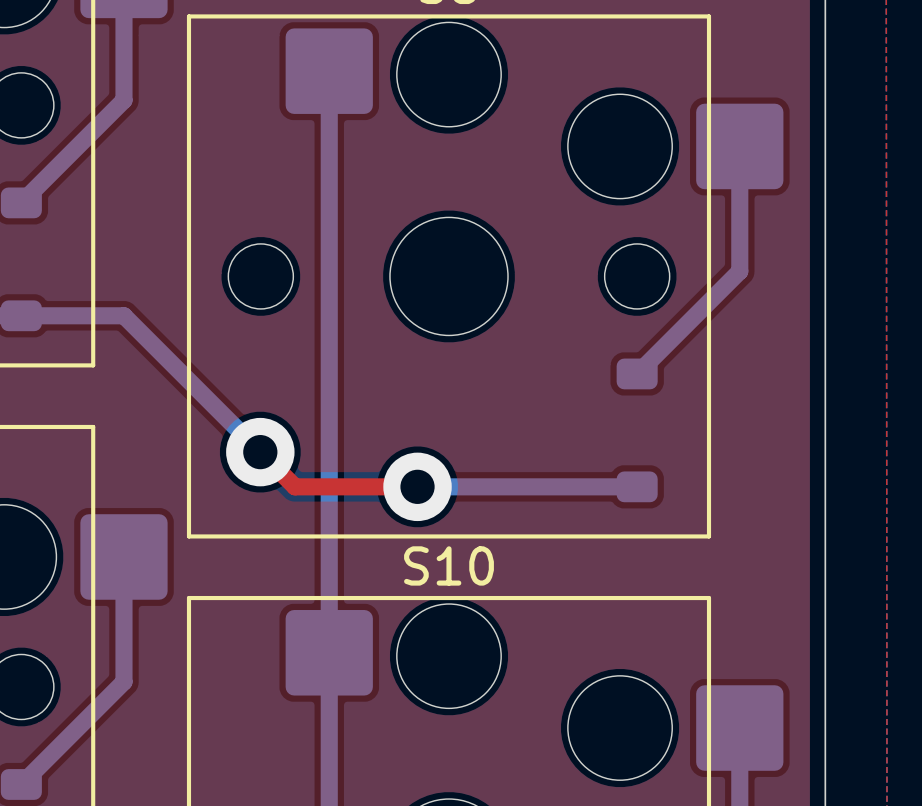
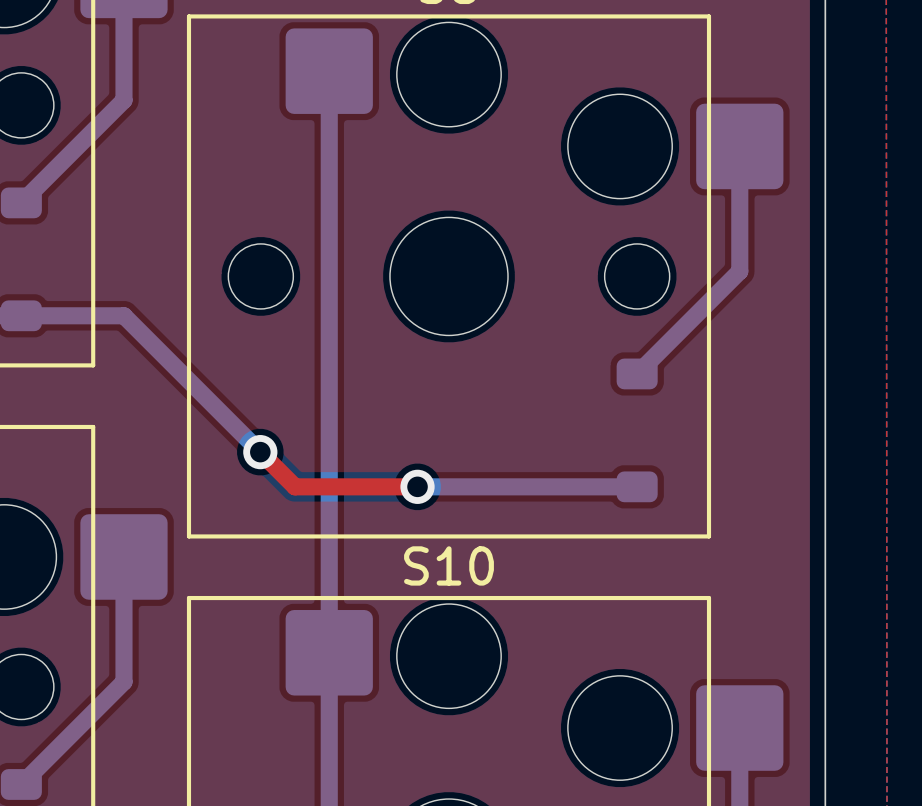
via size: [226, 417, 295, 487] -> [243, 435, 278, 470]
via size: [383, 452, 452, 522] -> [400, 469, 435, 504]

